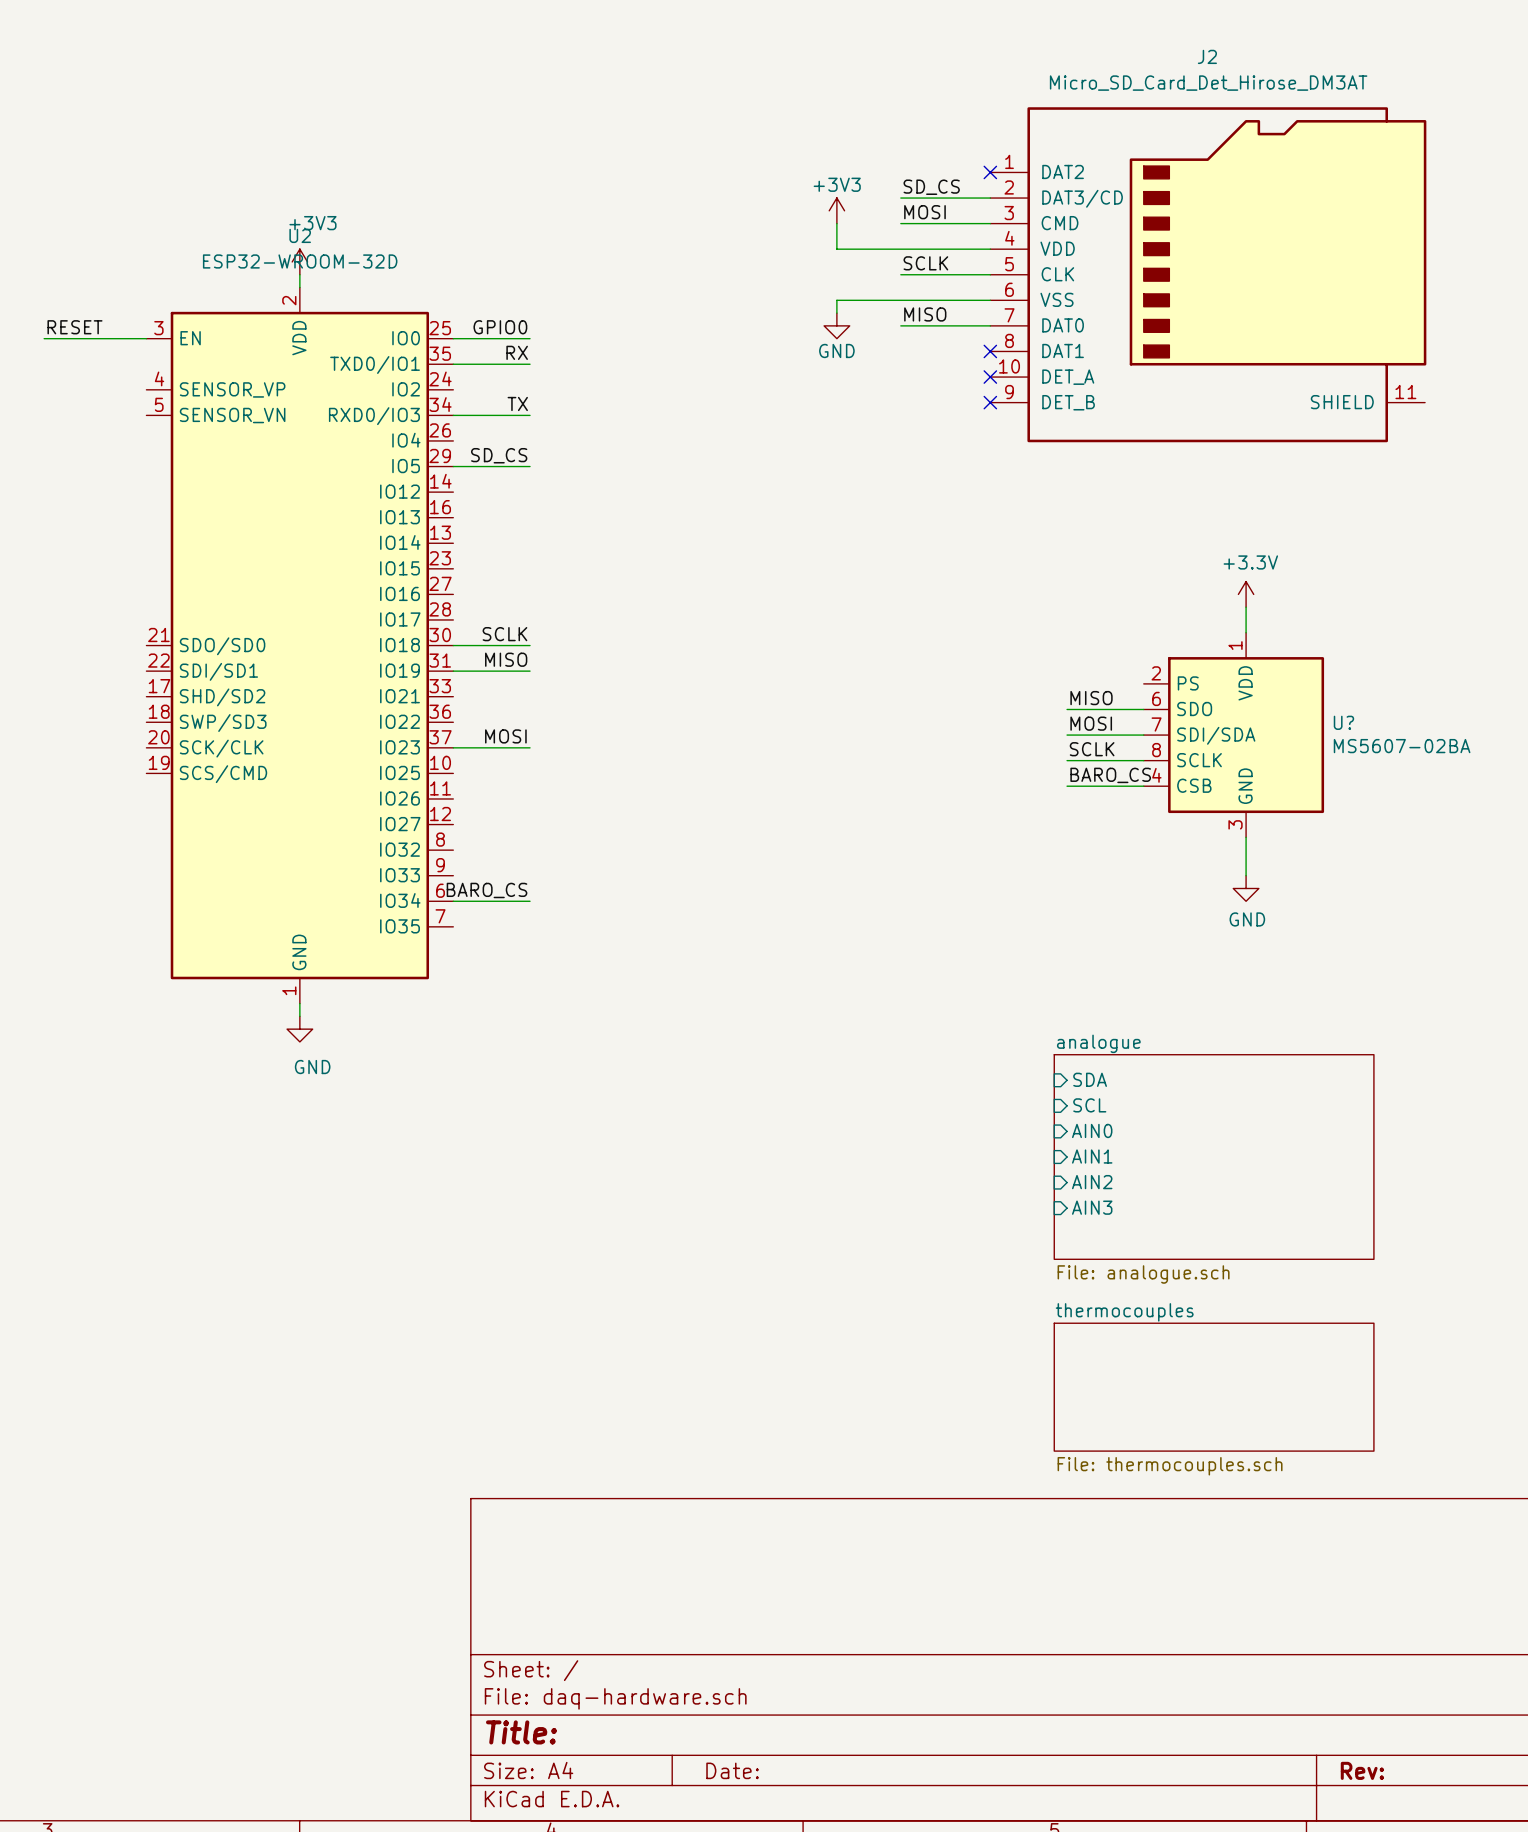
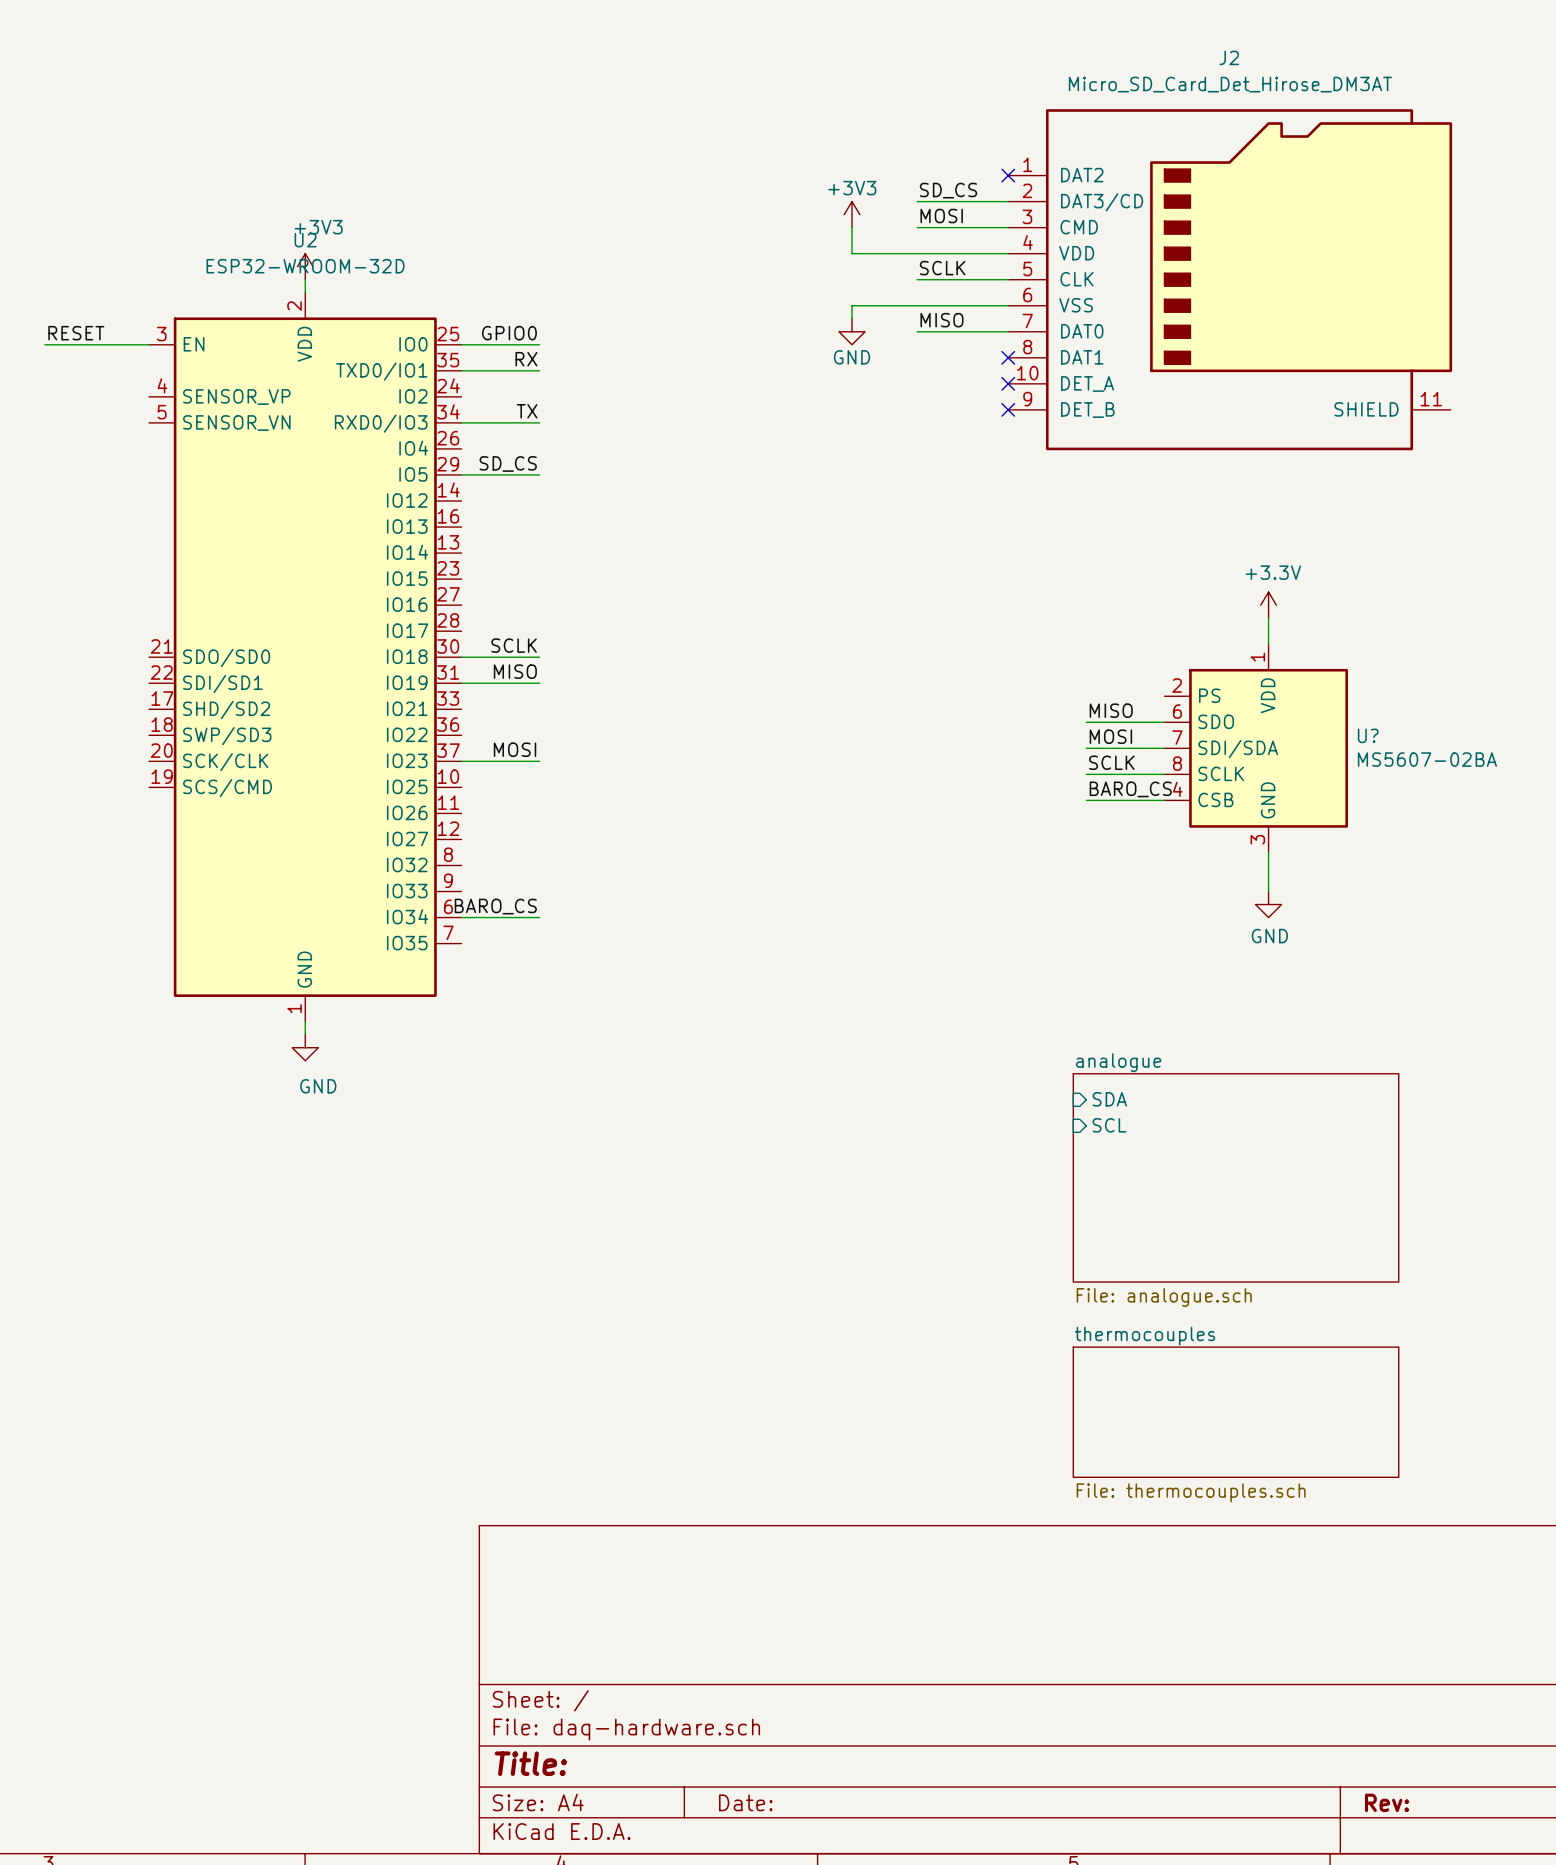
sheet pin: AIN0 (1092, 1130) -> none
sheet pin: AIN1 (1092, 1156) -> none
sheet pin: AIN2 (1092, 1182) -> none
sheet pin: AIN3 (1092, 1207) -> none

